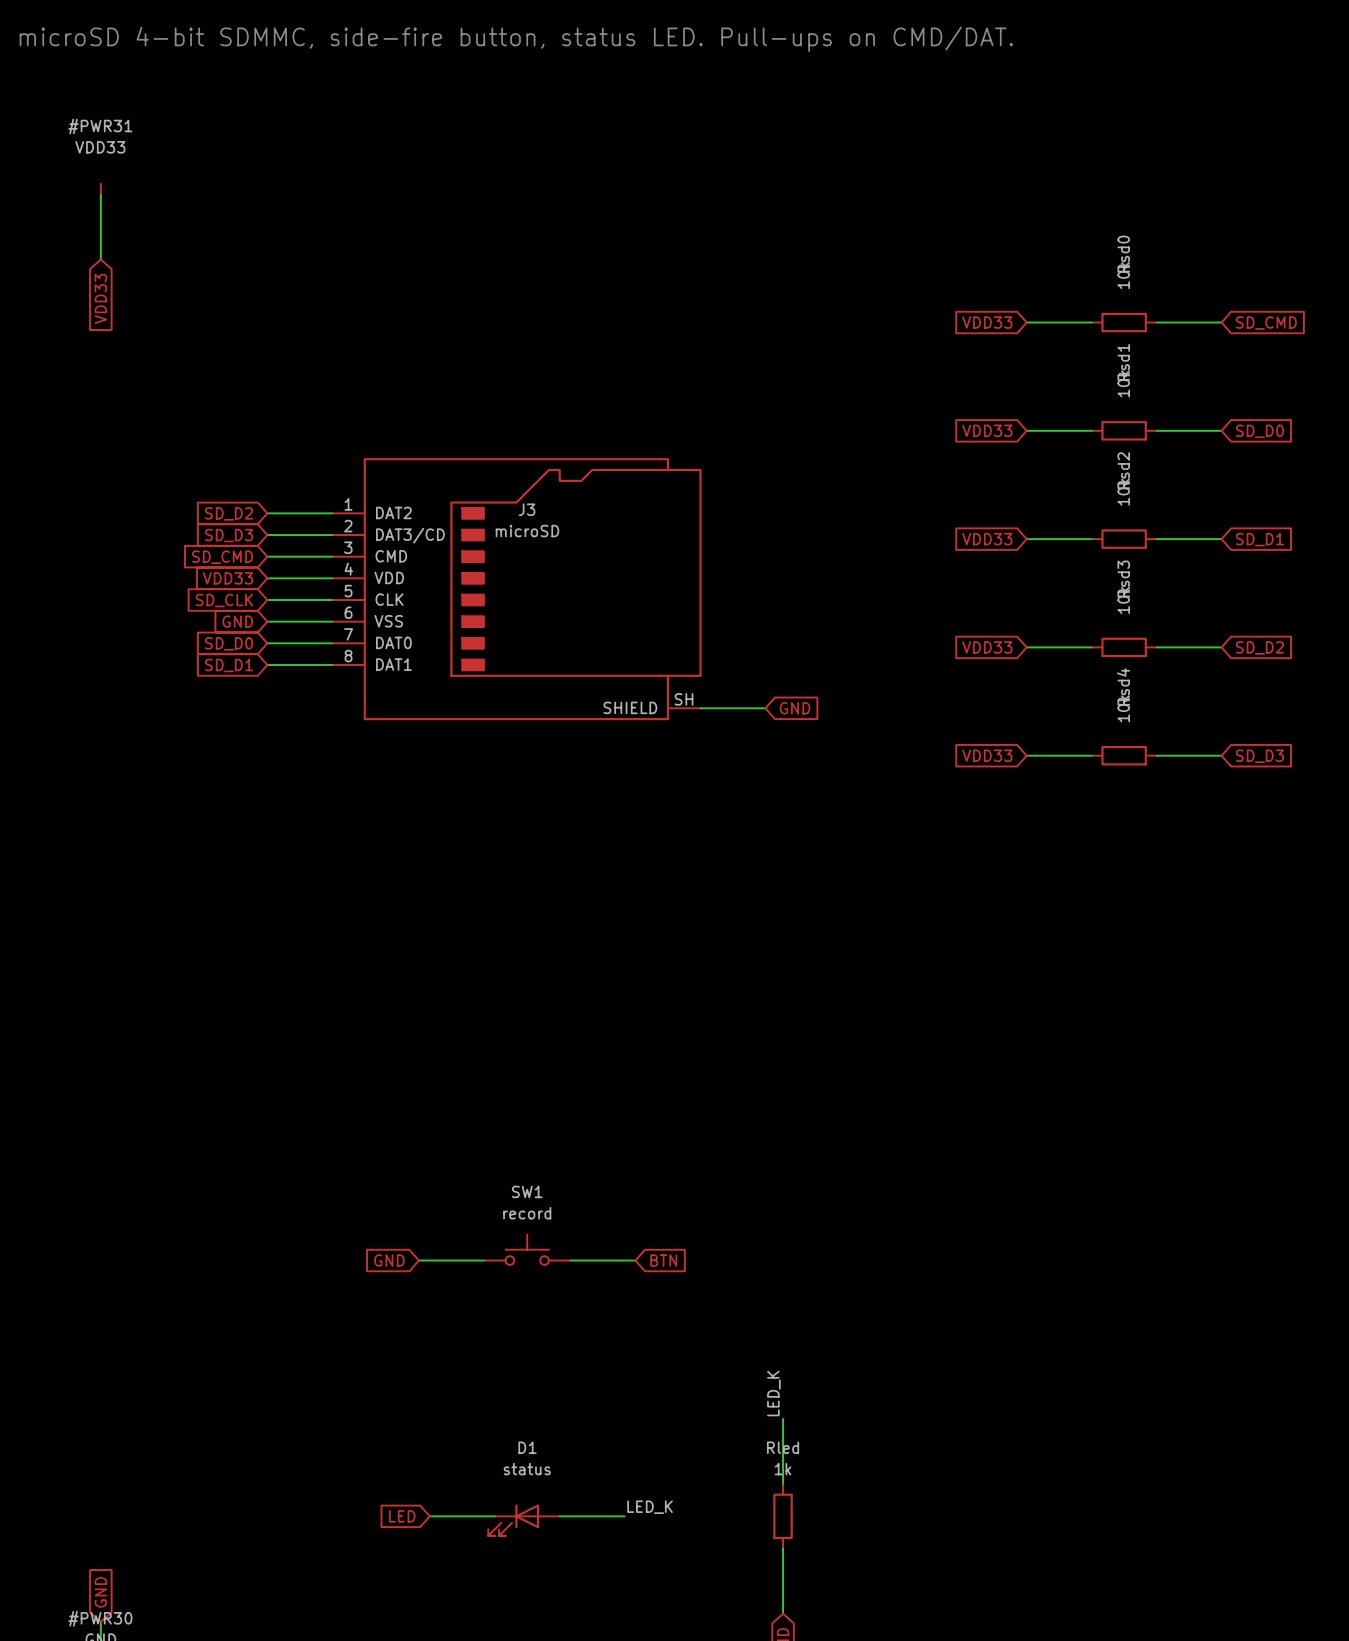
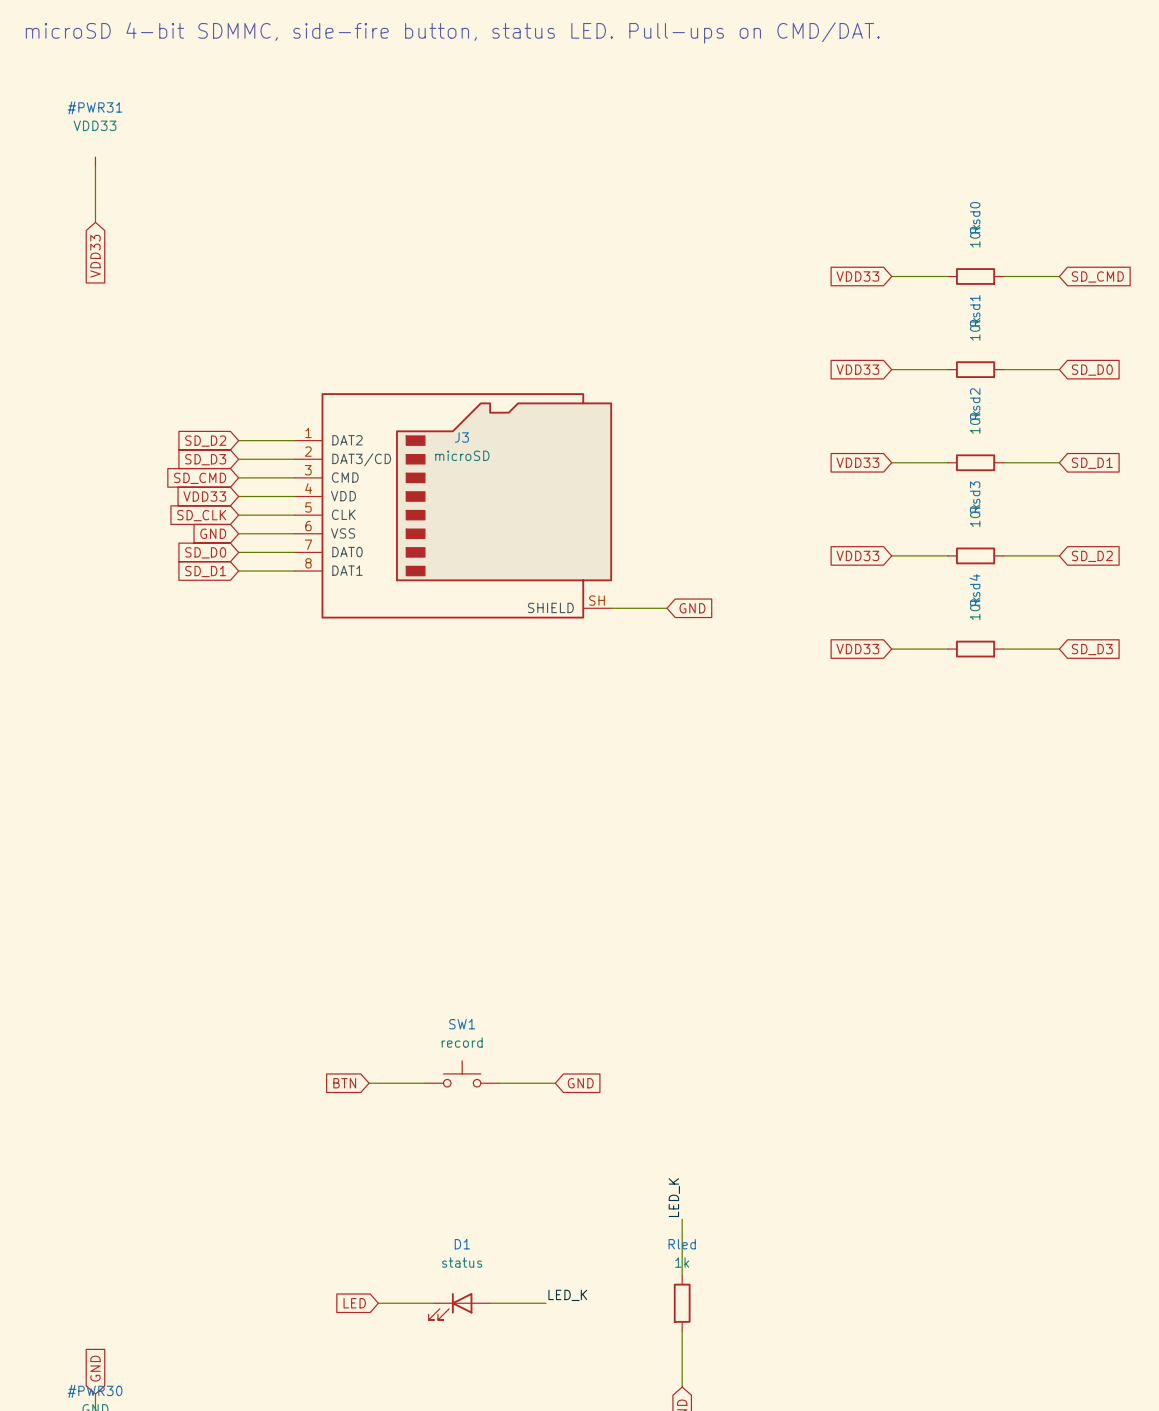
global label: GND (389, 1260) -> BTN (344, 1083)
global label: BTN (663, 1260) -> GND (580, 1083)

